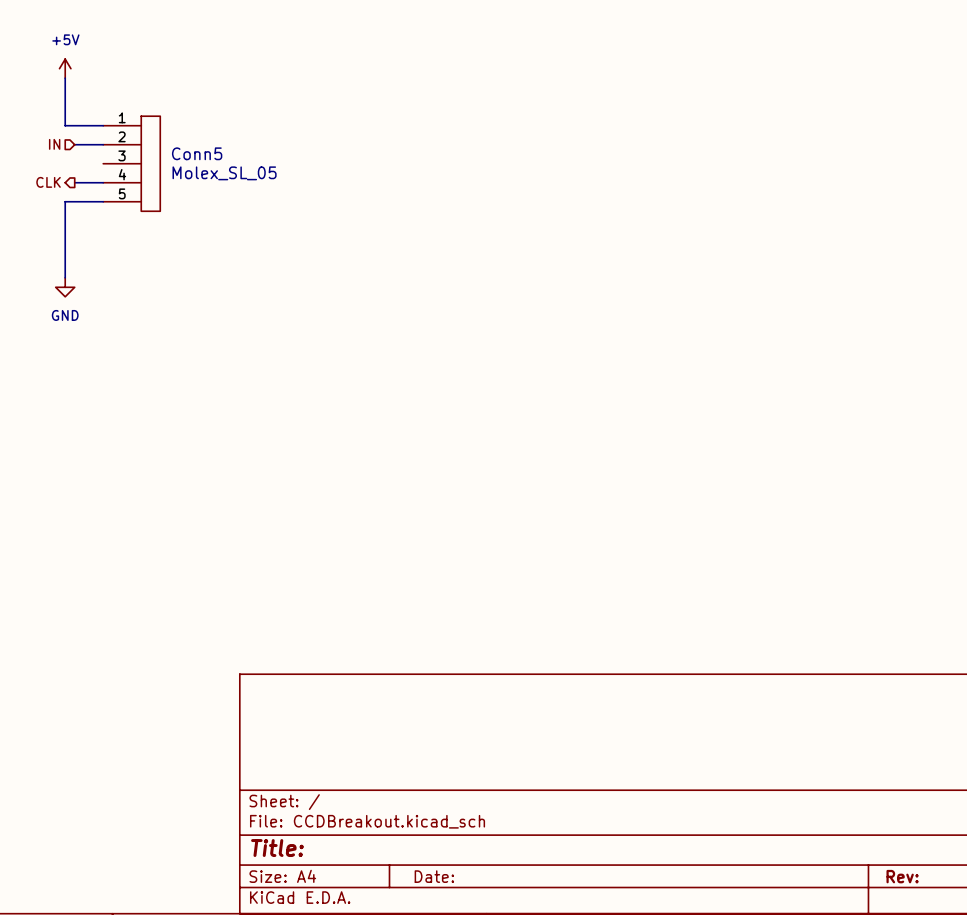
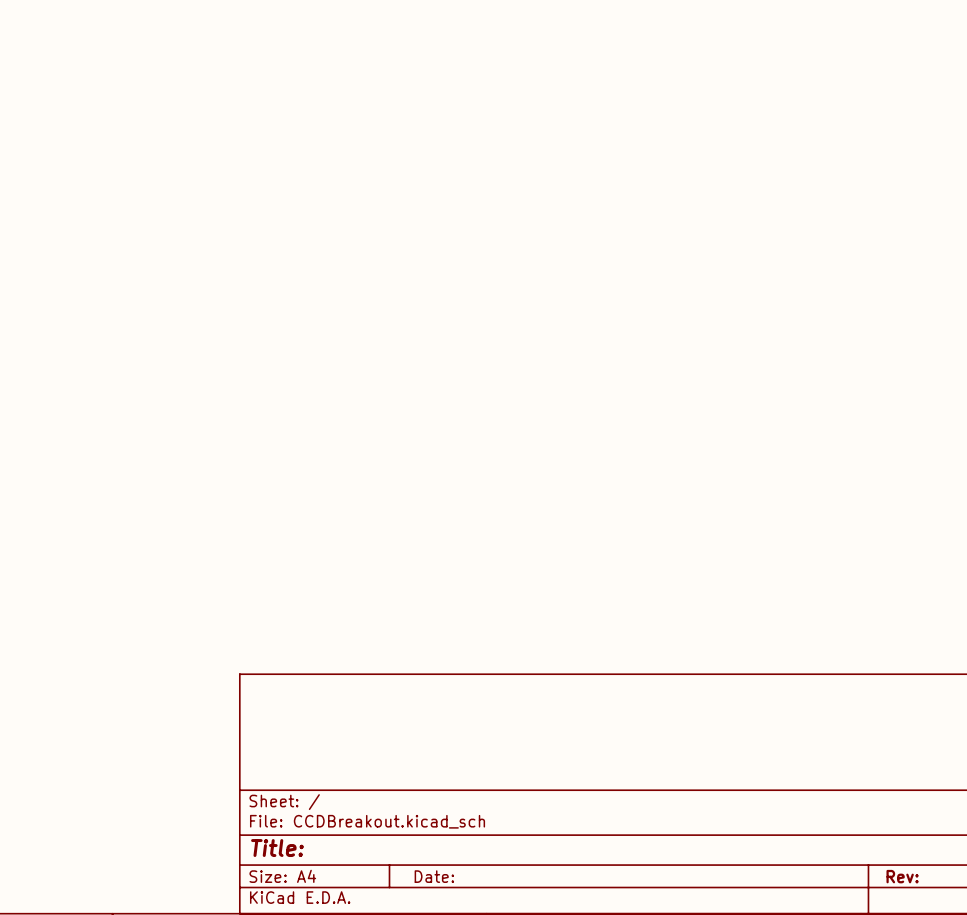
power symbol: +5V (65, 68) -> none
wire: (65, 78) (65, 125) (103, 125) -> none
hierarchical label: IN (54, 144) -> none
wire: (74, 144) (103, 144) -> none
Conn5: Molex_SL_05 (131, 163) -> none
hierarchical label: CLK (48, 182) -> none
wire: (74, 182) (103, 182) -> none
wire: (103, 201) (65, 201) (65, 277) -> none
power symbol: GND (65, 287) -> none

